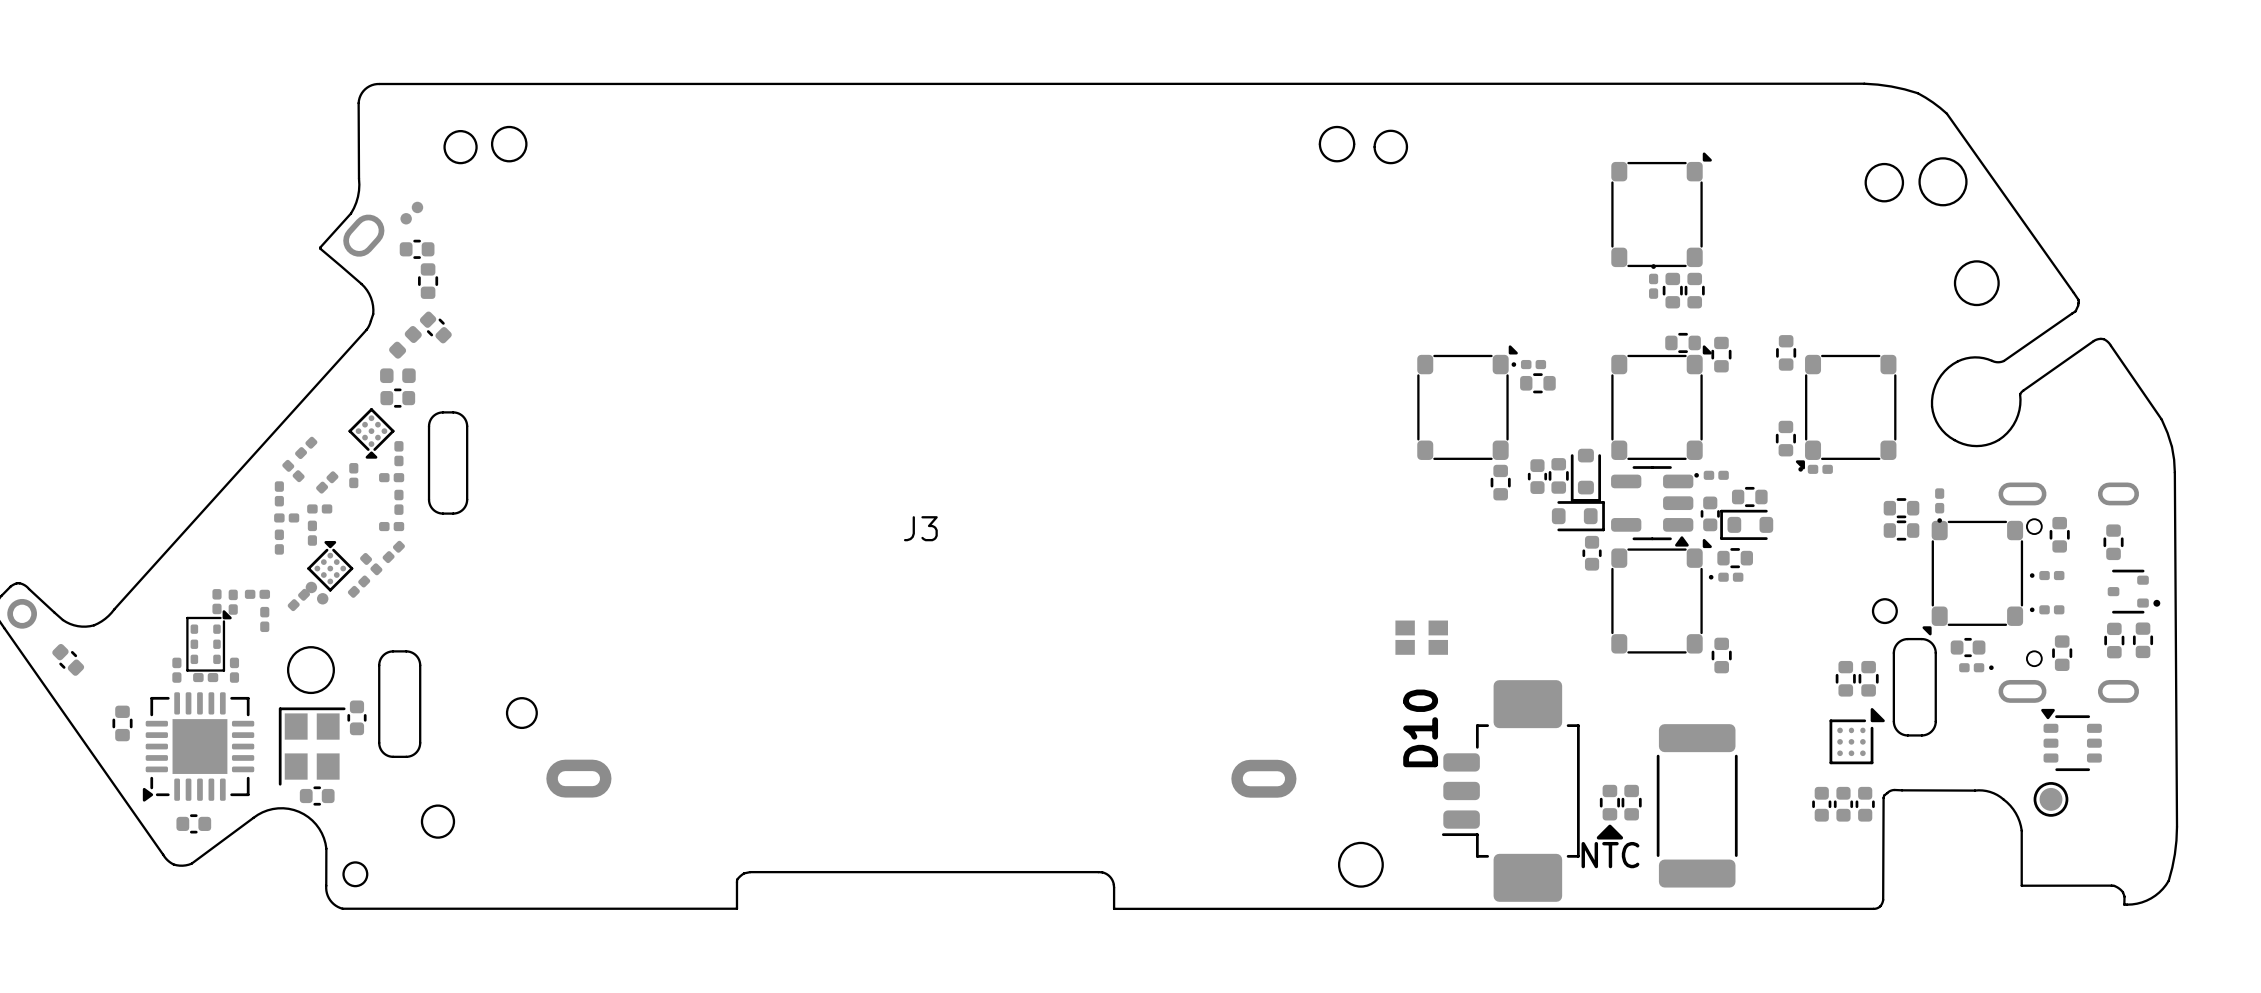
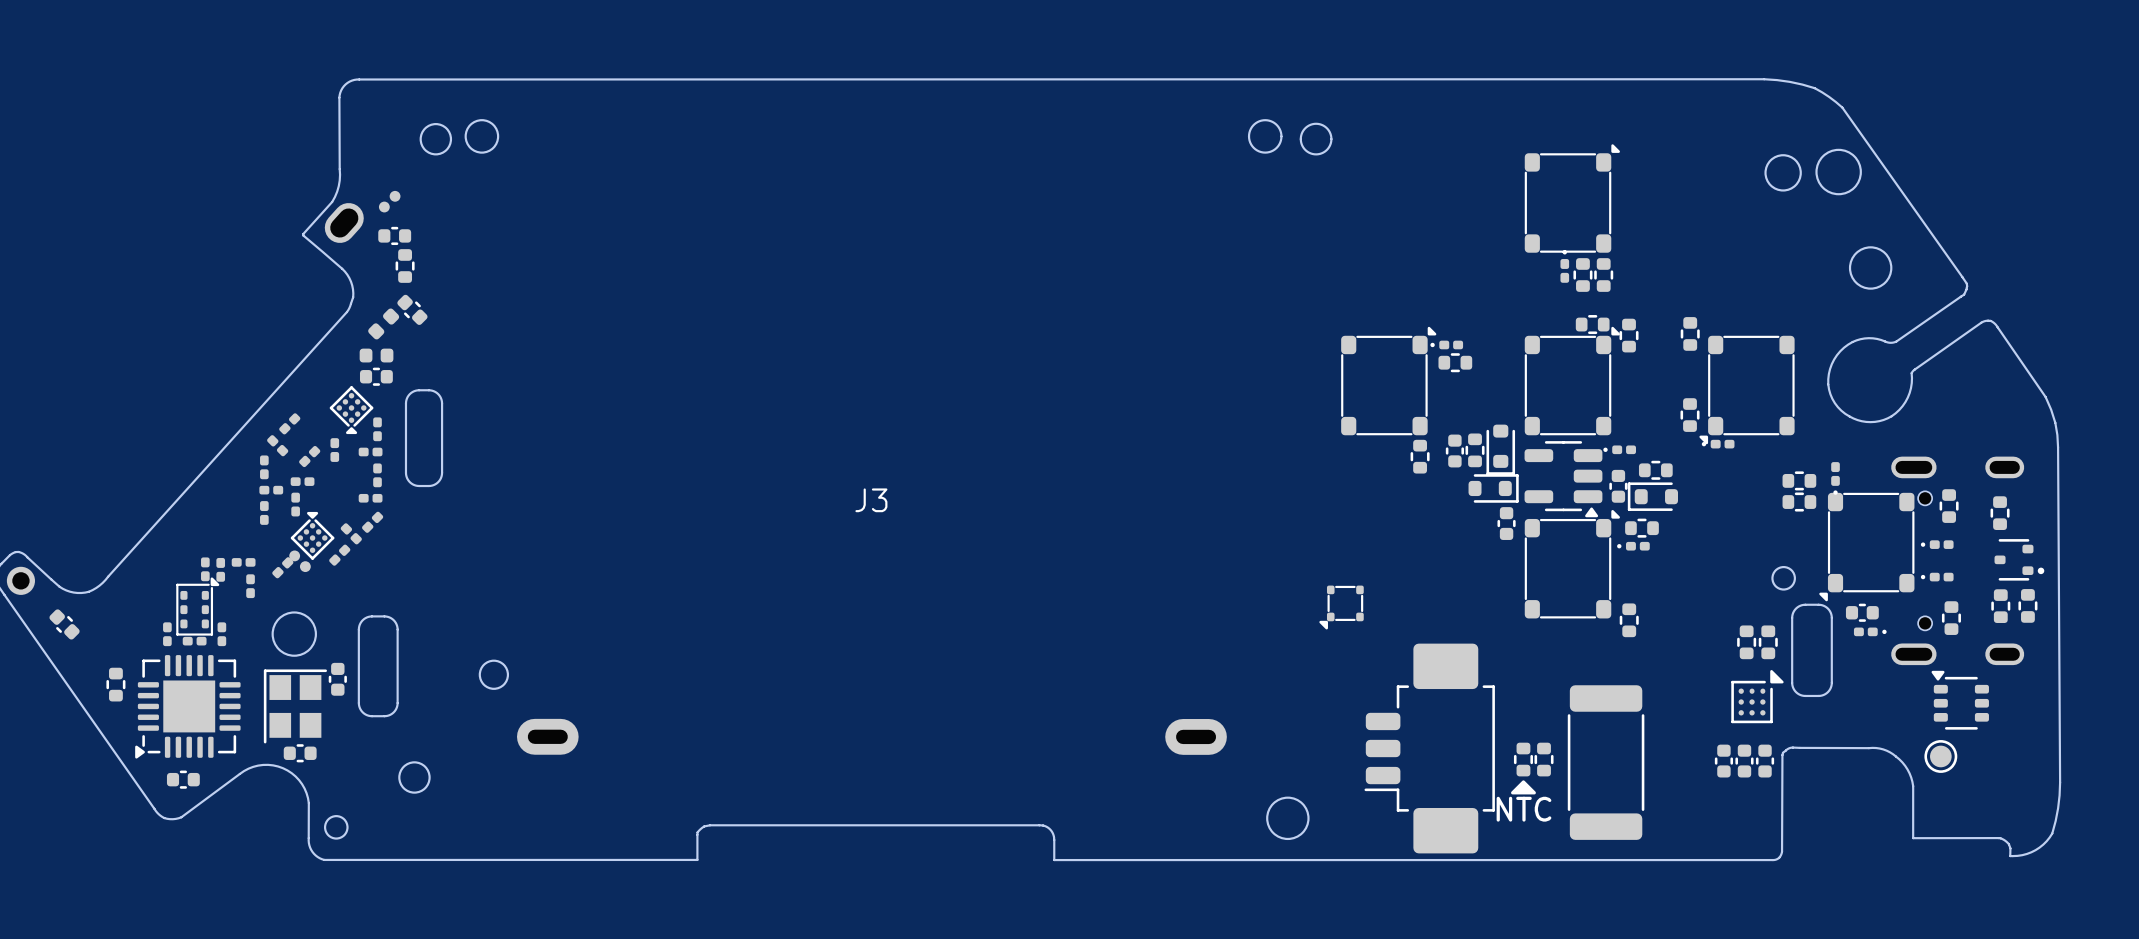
D10: (1421, 637) -> none
part: none -> (1341, 607)

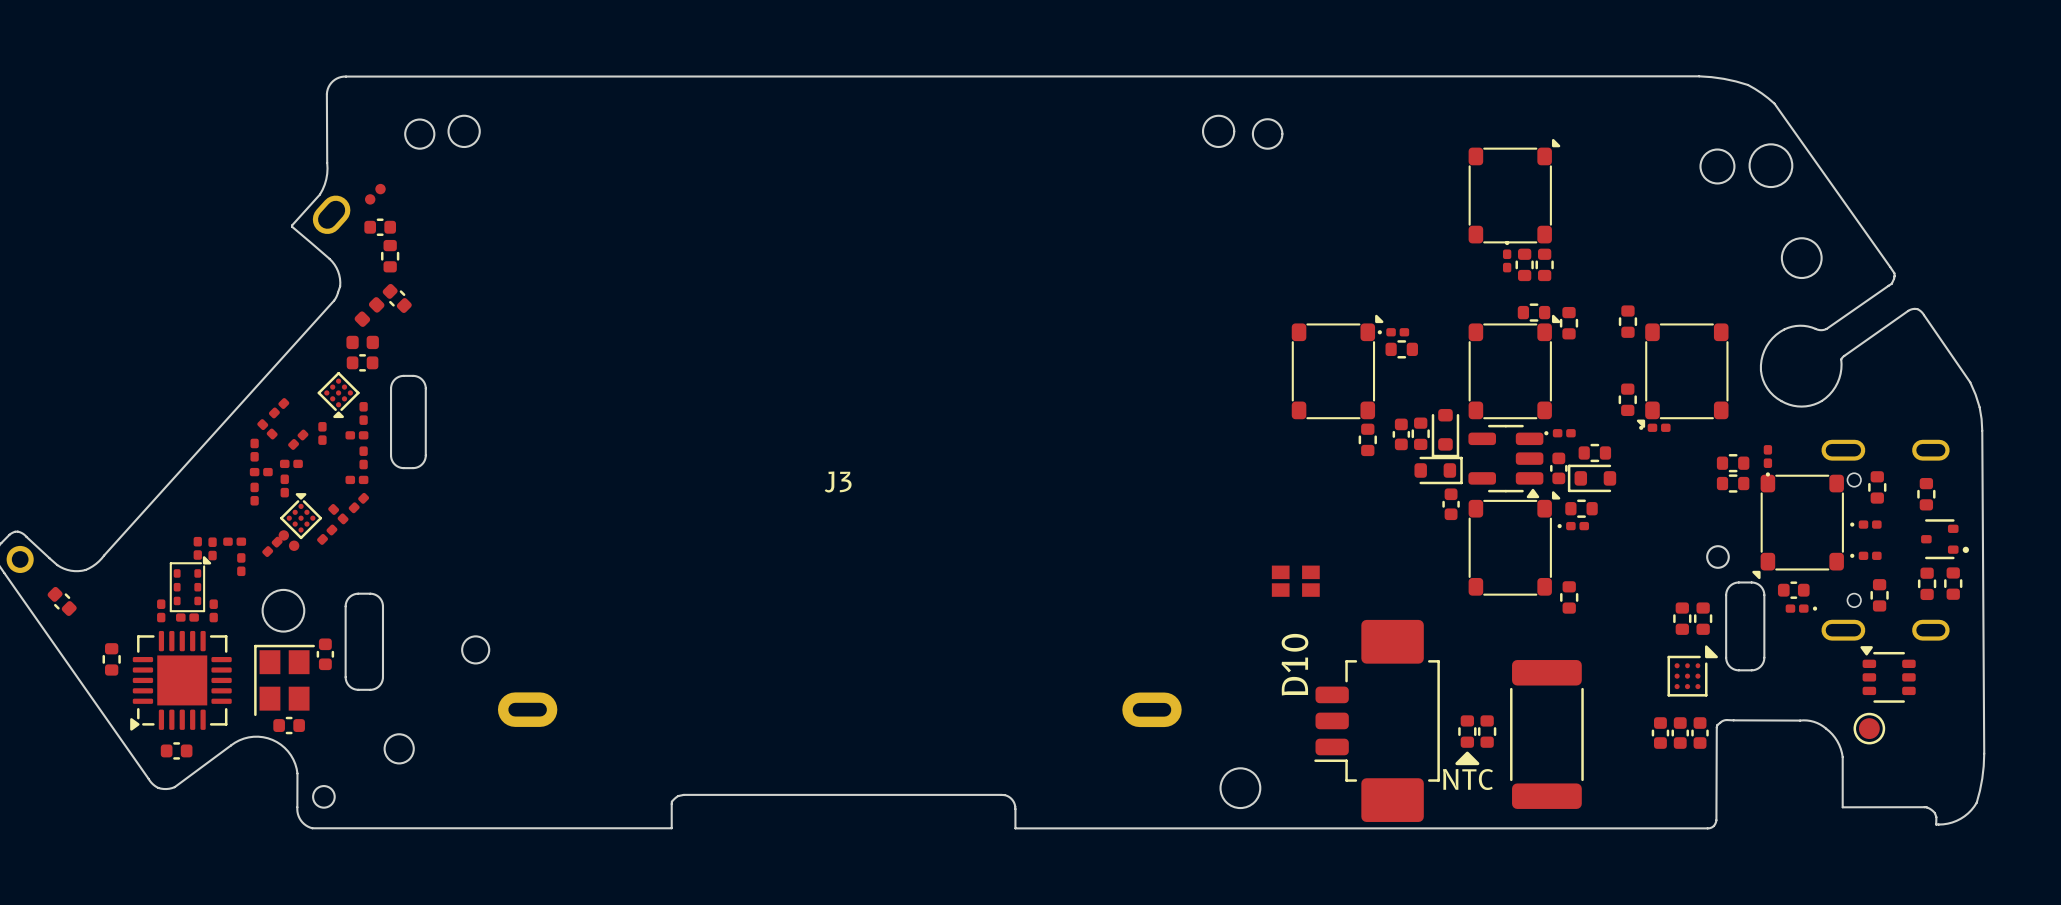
D10: none -> (1295, 581)
part: (1341, 607) -> none

